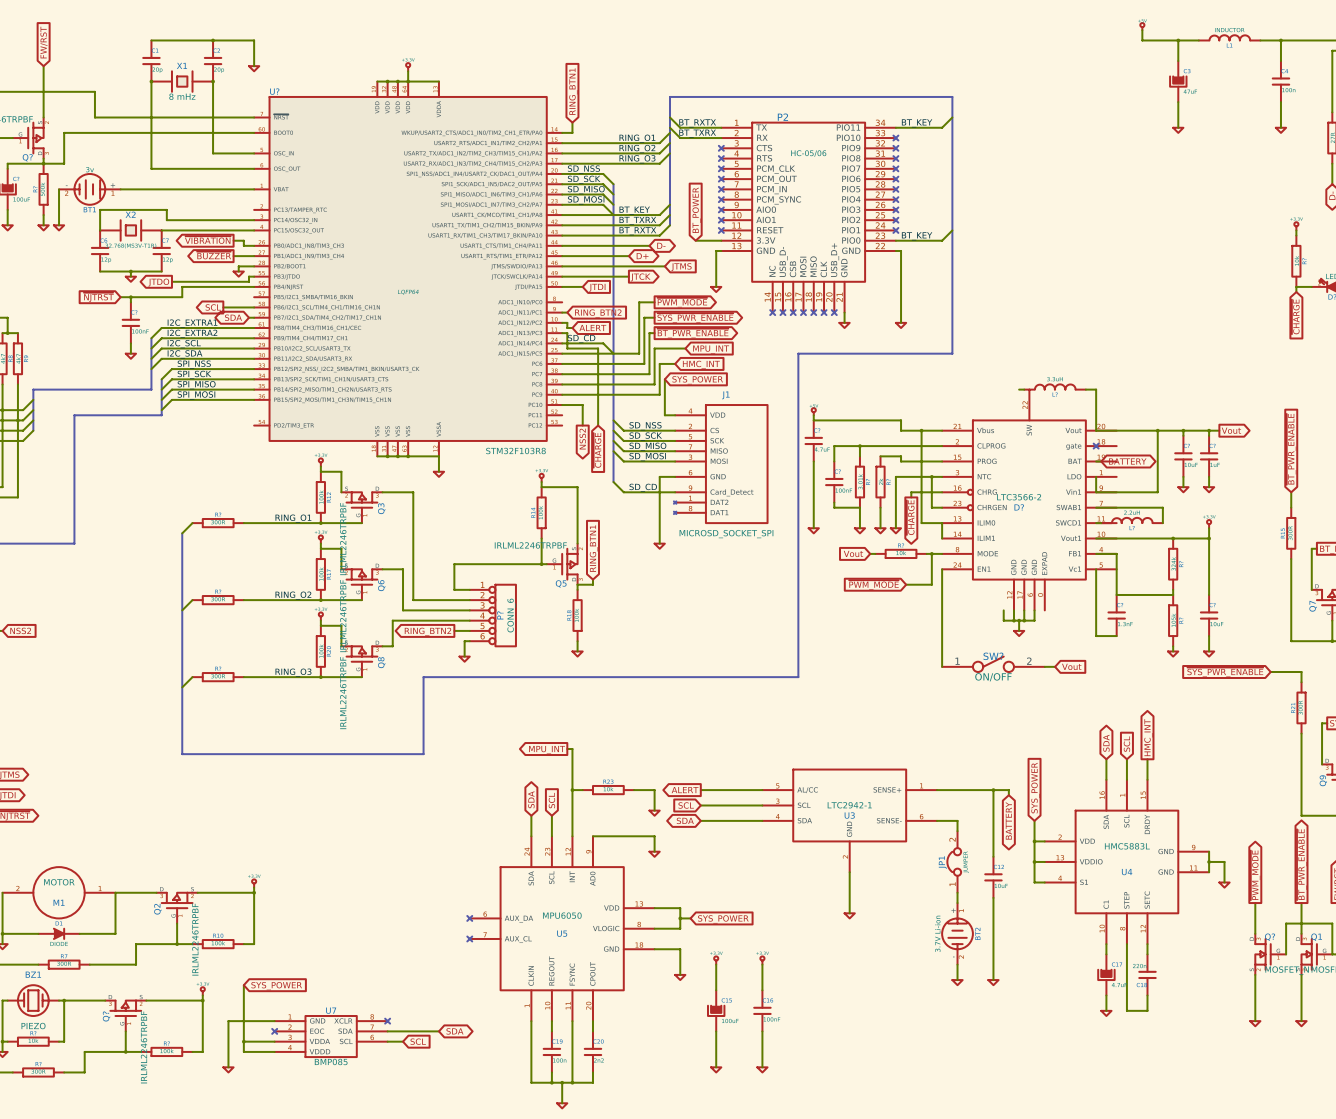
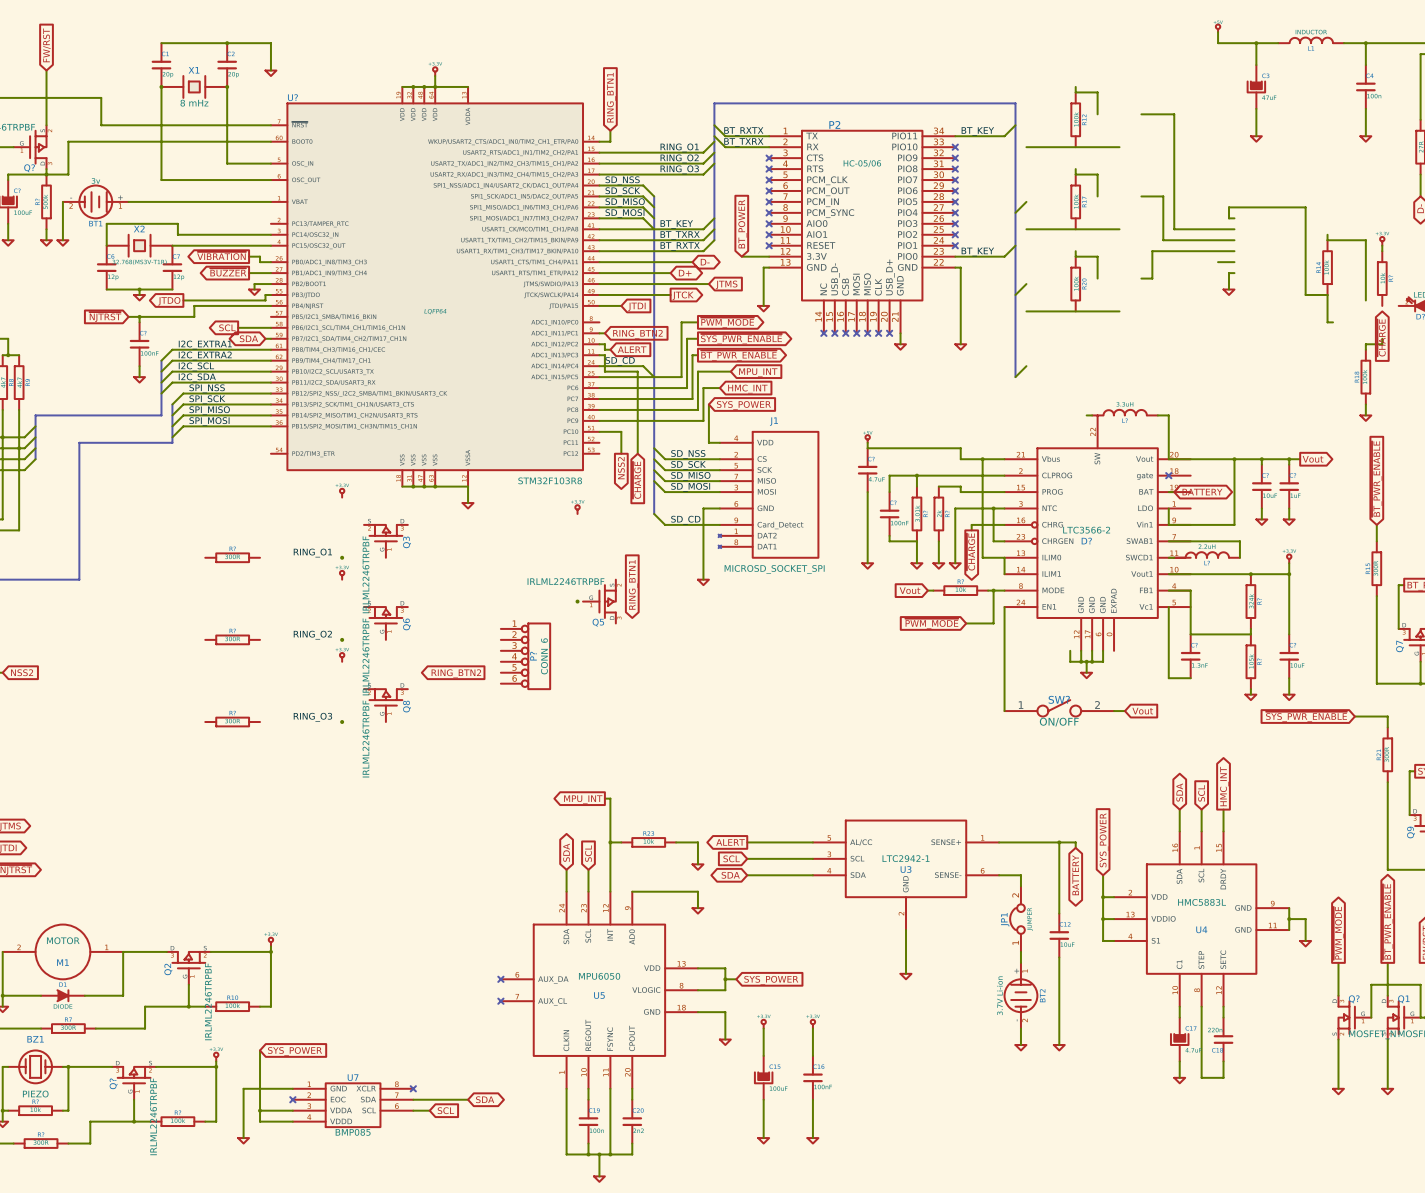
wire: none -> (1075, 86) (1075, 92) (1097, 92) (1097, 114)
wire: none -> (1141, 114) (1174, 114) (1174, 229) (1234, 229)
wire: none -> (1026, 147) (1119, 147)
wire: none -> (1075, 169) (1075, 174) (1097, 174) (1097, 196)
wire: none -> (1141, 196) (1163, 196) (1163, 240) (1234, 240)
wire: none -> (1026, 201) (1015, 212)
wire: none -> (1234, 218) (1229, 218) (1229, 207) (1305, 207) (1305, 294) (1327, 294) (1327, 322) (1333, 322)
wire: none -> (1026, 229) (1119, 229)
wire: none -> (1327, 234) (1327, 240) (1365, 240) (1365, 300)
wire: none -> (1075, 251) (1075, 256) (1097, 256) (1097, 278)
wire: none -> (1234, 251) (1152, 251) (1152, 278) (1141, 278)
wire: none -> (1218, 262) (1234, 262)
wire: none -> (1234, 273) (1229, 273) (1229, 289)
wire: none -> (1026, 284) (1015, 294)
power symbol: none -> (1229, 292)
wire: (1311, 286) (1296, 286) (1296, 292) -> none
wire: none -> (1026, 311) (1119, 311)
wire: none -> (1382, 338) (1382, 344) (1365, 344) (1365, 349)
wire: none -> (1026, 366) (1015, 377)
bus: (952, 353) (798, 353) (798, 677) (423, 677) (423, 754) (182, 754) (182, 533) -> none
wire: none -> (1365, 404) (1365, 415)
power symbol: none -> (1365, 418)
wire: (320, 466) (320, 471) (341, 471) (341, 492) -> none
wire: (541, 482) (541, 487) (577, 487) (577, 543) -> none
wire: (382, 492) (413, 492) (413, 600) (469, 600) -> none
part position: (320, 497) -> (1075, 119)
part position: (541, 512) -> (1327, 267)
wire: (192, 523) (182, 533) -> none
wire: (243, 523) (361, 523) -> none
wire: (541, 538) (541, 564) -> none
wire: (320, 543) (320, 548) (341, 548) (341, 569) -> none
wire: (546, 564) (454, 564) (454, 589) (469, 589) -> none
wire: (382, 569) (403, 569) (403, 610) (469, 610) -> none
part position: (320, 574) -> (1075, 201)
wire: (592, 579) (592, 584) (577, 584) (577, 589) -> none
wire: (192, 600) (182, 610) -> none
wire: (243, 600) (361, 600) -> none
part position: (577, 615) -> (1365, 377)
wire: (320, 620) (320, 625) (341, 625) (341, 646) -> none
wire: (469, 620) (392, 620) (392, 646) (382, 646) -> none
wire: (454, 630) (469, 630) -> none
wire: (469, 641) (464, 641) (464, 656) -> none
wire: (577, 641) (577, 651) -> none
part position: (320, 651) -> (1075, 284)
power symbol: (577, 654) -> none
power symbol: (464, 659) -> none
wire: (192, 677) (182, 687) -> none
wire: (243, 677) (361, 677) -> none

